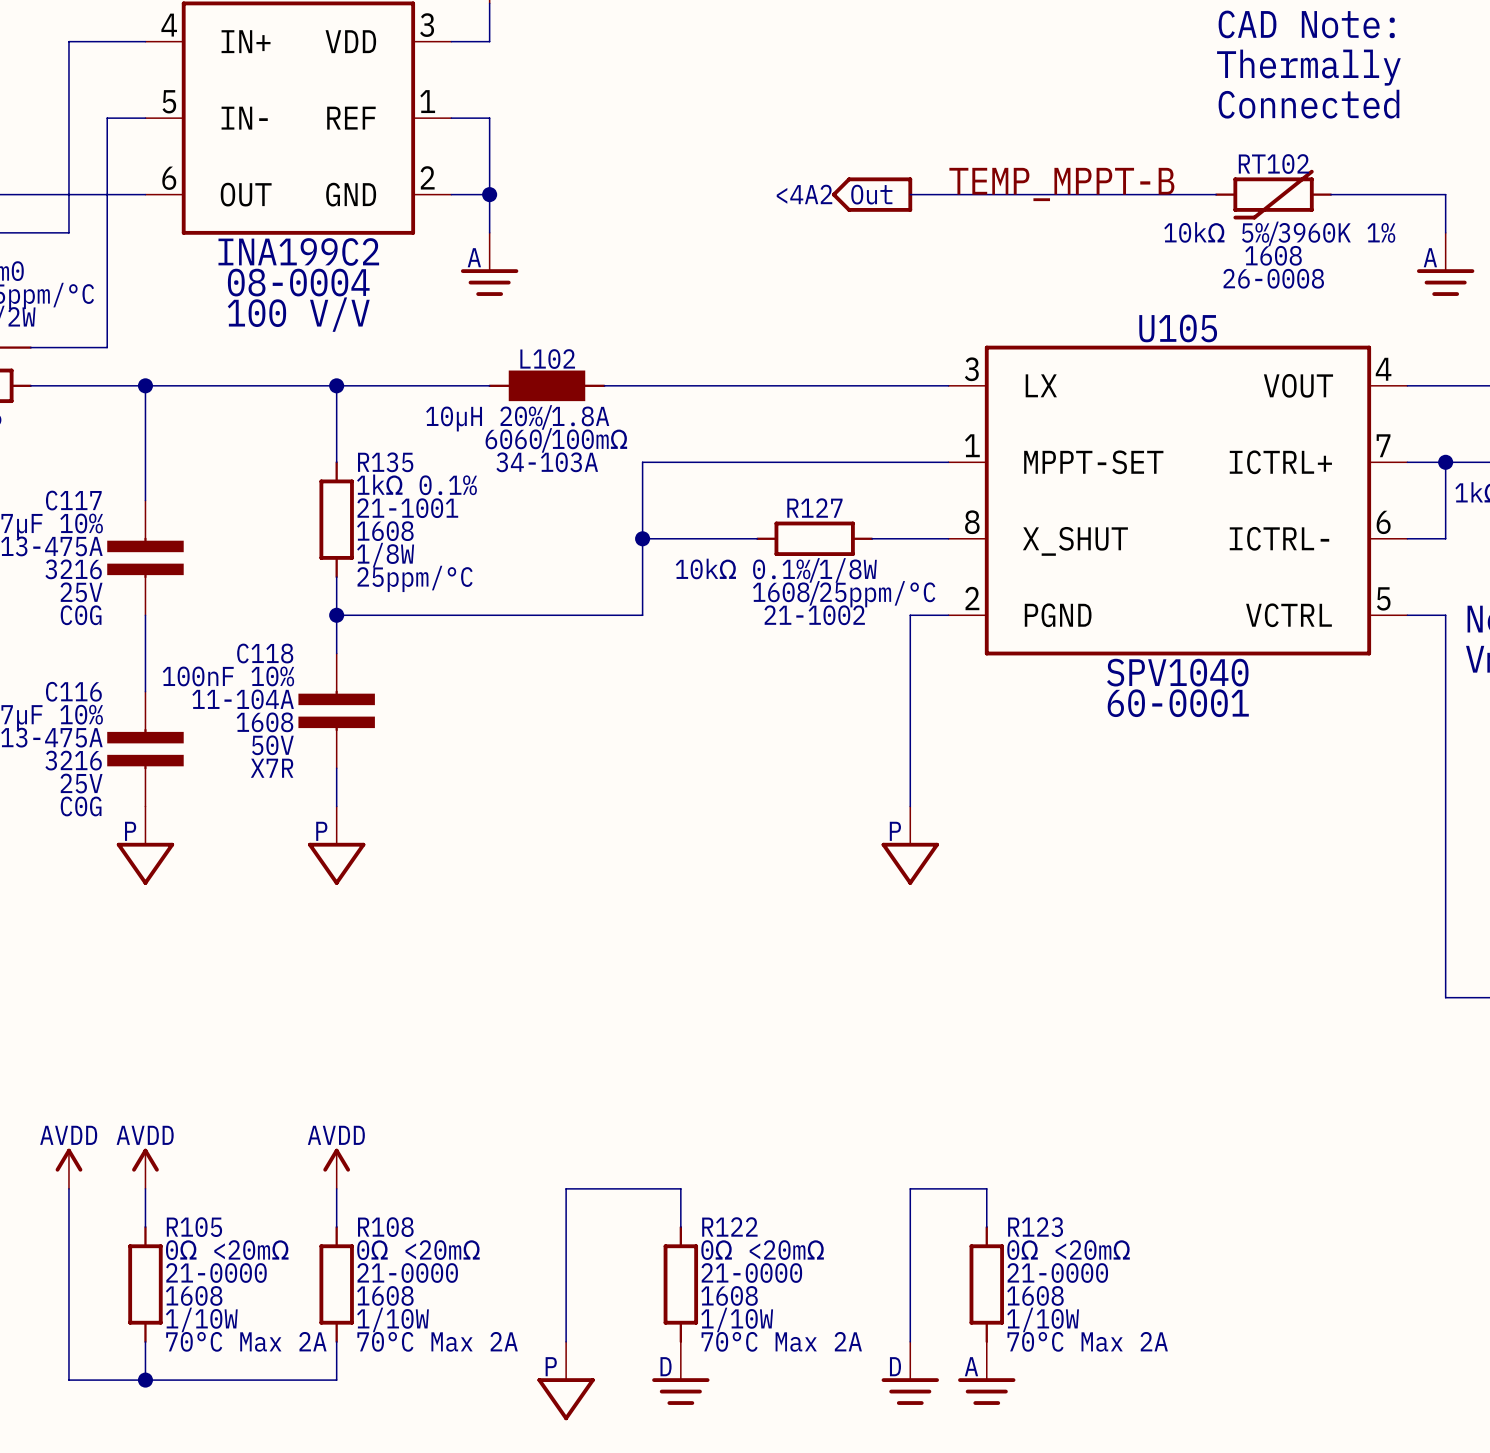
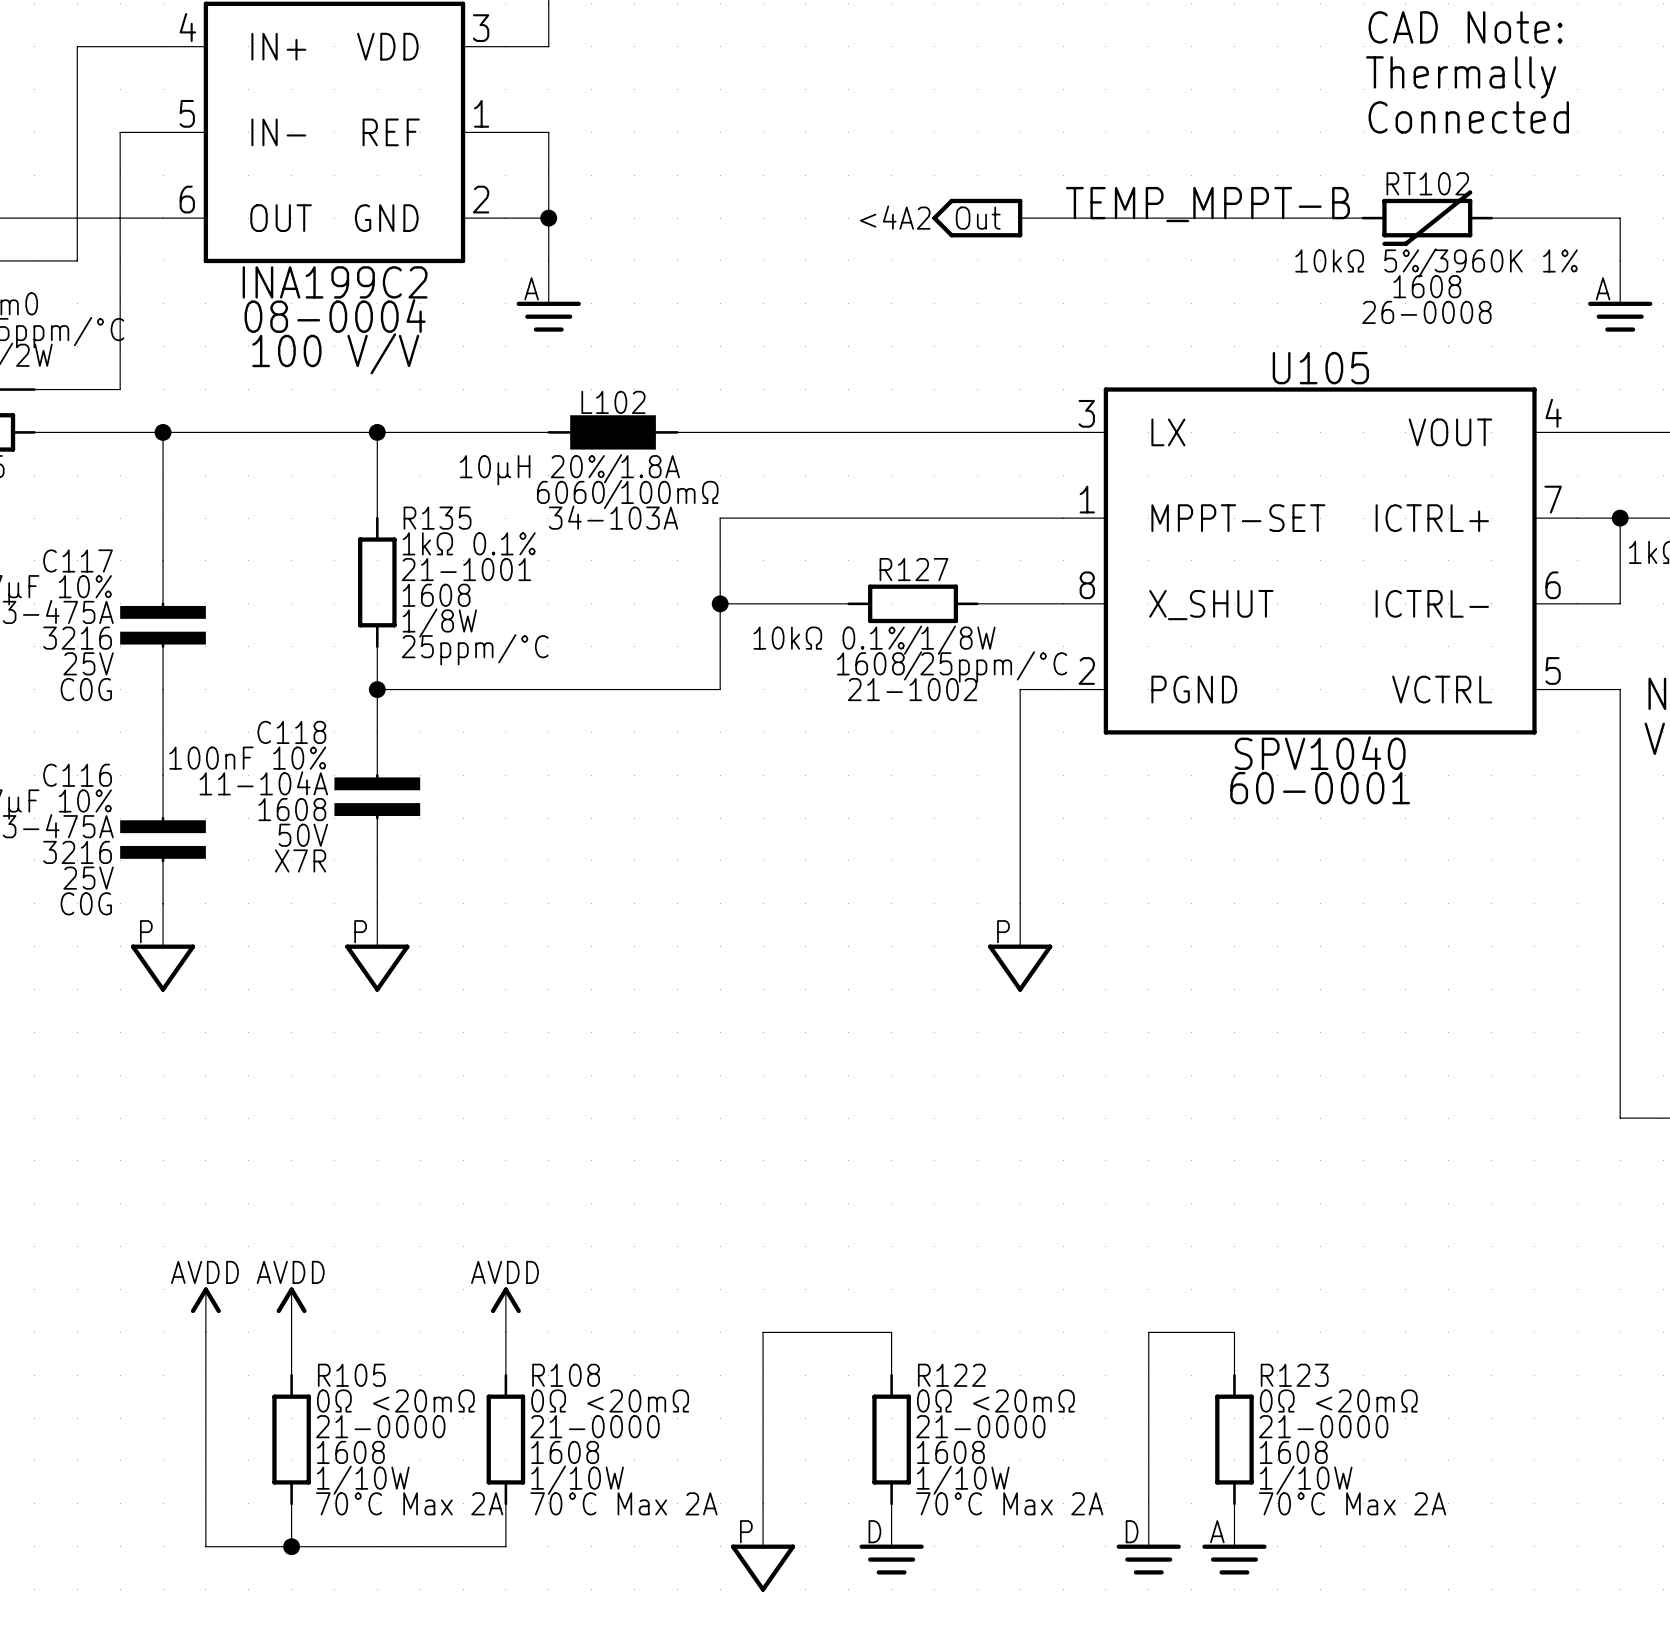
power symbol: AVDD (68, 1168) -> none
power symbol position: AVDD (145, 1168) -> AVDD (205, 1309)
power symbol: none -> AVDD (291, 1309)
power symbol: AVDD (336, 1168) -> none
power symbol: none -> AVDD (505, 1309)
wire: (68, 1188) (68, 1380) (183, 1380) -> (205, 1332) (205, 1546)
wire: (145, 1188) (145, 1227) -> (291, 1332) (291, 1375)
wire: (336, 1188) (336, 1227) -> (505, 1332) (505, 1375)
wire: (680, 1188) (566, 1188) (566, 1341) -> (763, 1332) (891, 1332) (891, 1375)
wire: none -> (763, 1375) (763, 1503)
wire: (986, 1227) (986, 1188) (910, 1188) (910, 1341) -> (1234, 1375) (1234, 1332) (1148, 1332) (1148, 1503)
R105 position: (145, 1284) -> (291, 1439)
R108 position: (336, 1284) -> (505, 1439)
R122 position: (680, 1284) -> (891, 1439)
R123 position: (986, 1284) -> (1234, 1439)
wire: (145, 1341) (145, 1380) -> (291, 1503) (291, 1546)
wire: (336, 1341) (336, 1380) -> (505, 1503) (505, 1546) (377, 1546)
power symbol shape: [652, 1341, 710, 1405] -> [730, 1503, 796, 1592]
power symbol: none -> (891, 1539)
power symbol: (910, 1373) -> none
power symbol position: (986, 1373) -> (1234, 1539)
power symbol: none -> (1148, 1539)
junction: (145, 1380) -> none
junction: none -> (291, 1546)
power symbol: (566, 1381) -> none

